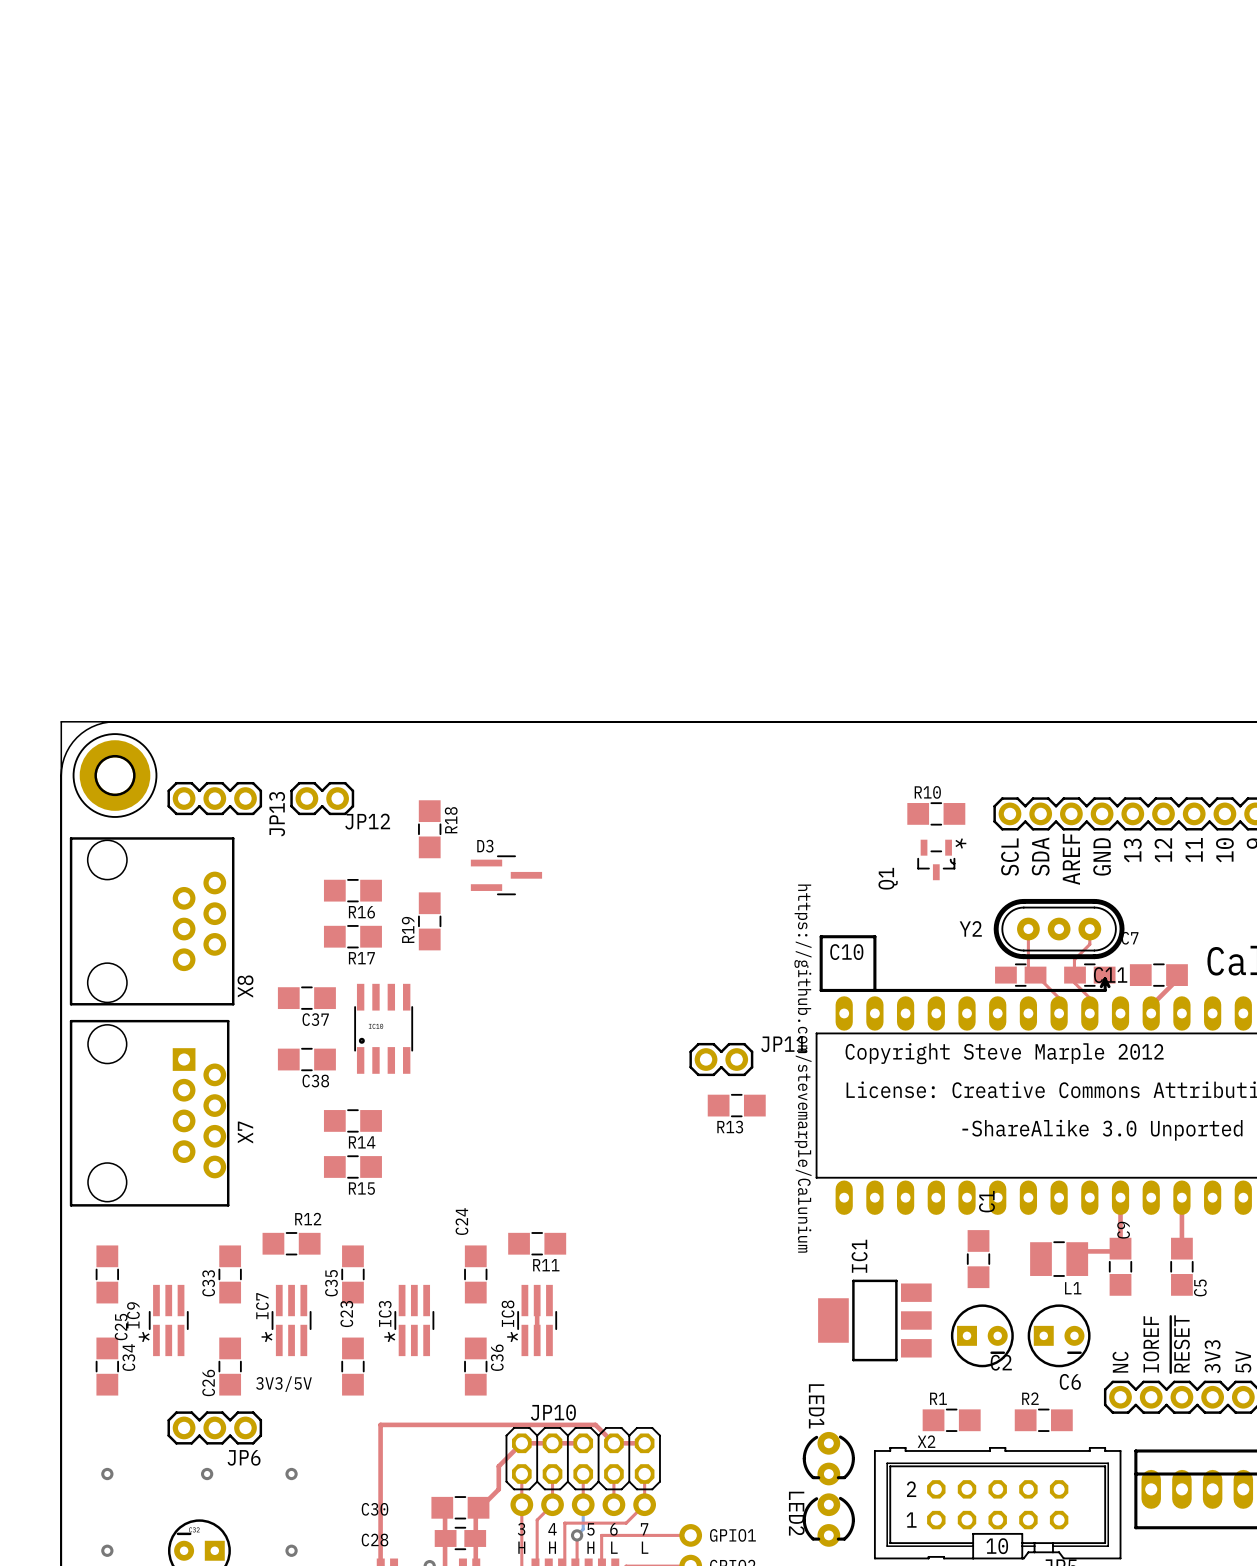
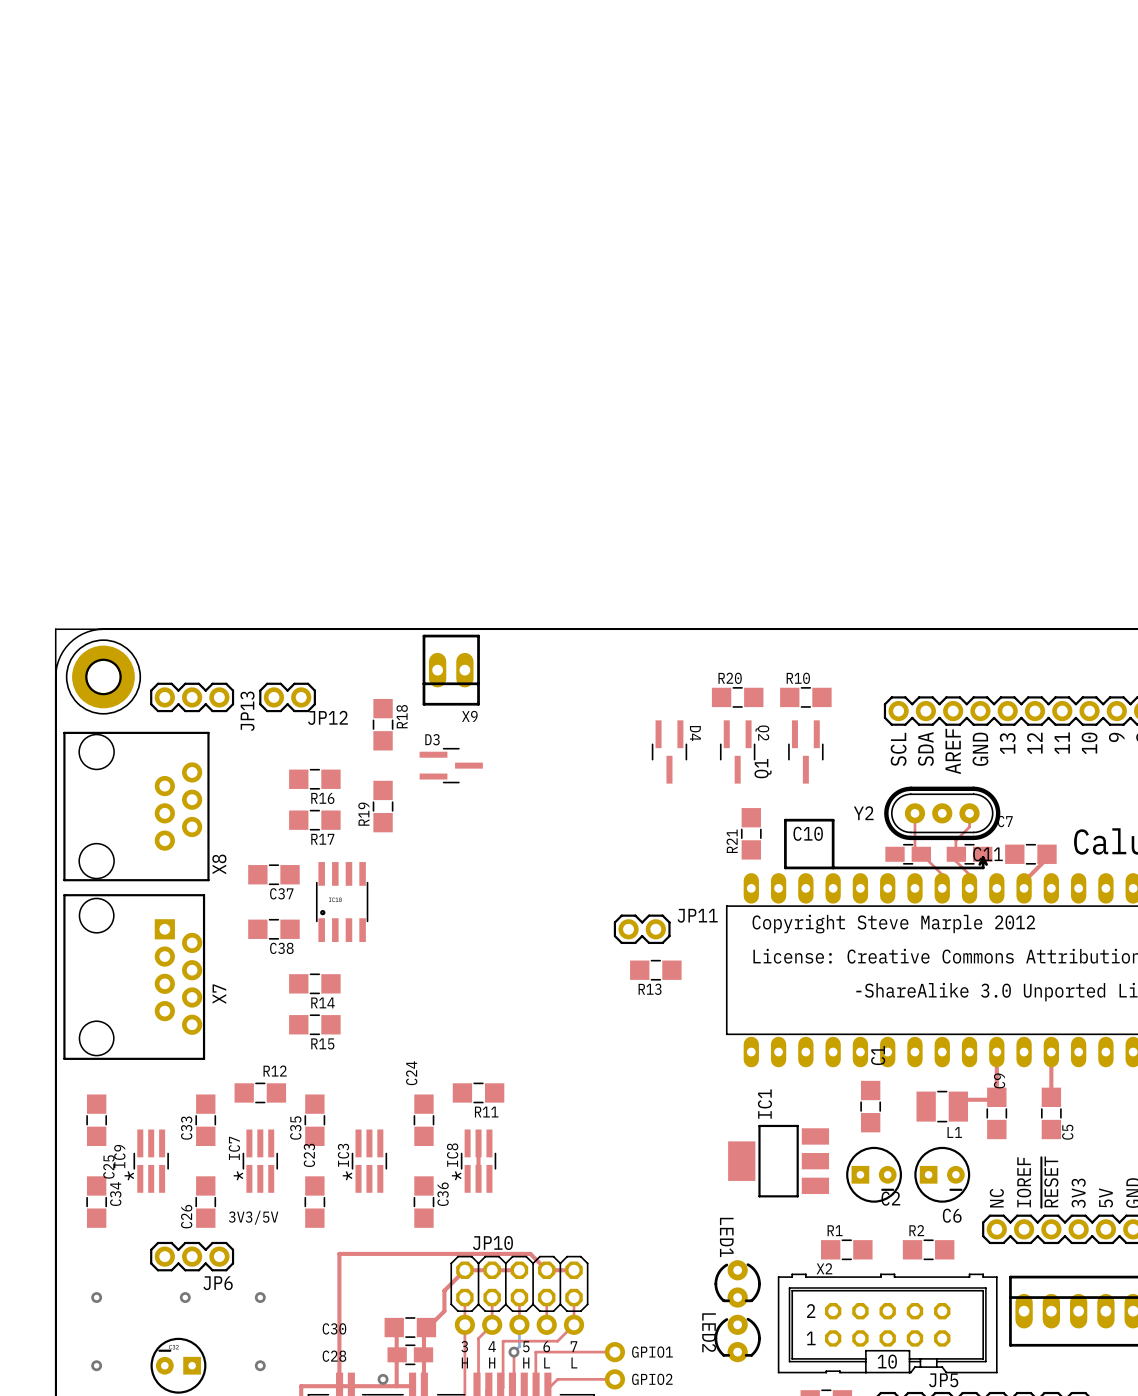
X9: none -> (451, 670)
R20: none -> (737, 697)
R10 position: (936, 813) -> (805, 697)
Q1 footprint: [917, 839, 956, 881] -> [788, 720, 824, 784]
D4: none -> (669, 751)
Q2: none -> (737, 751)
R21: none -> (751, 833)
C10 name position: C10 (846, 952) -> C10 (808, 833)
line: (874, 990) (874, 936) (821, 936) (821, 990) (882, 990) -> (833, 867) (833, 820) (785, 820) (785, 867)
text: https://github.com/stevemarple/Calunium (802, 1068) -> none

